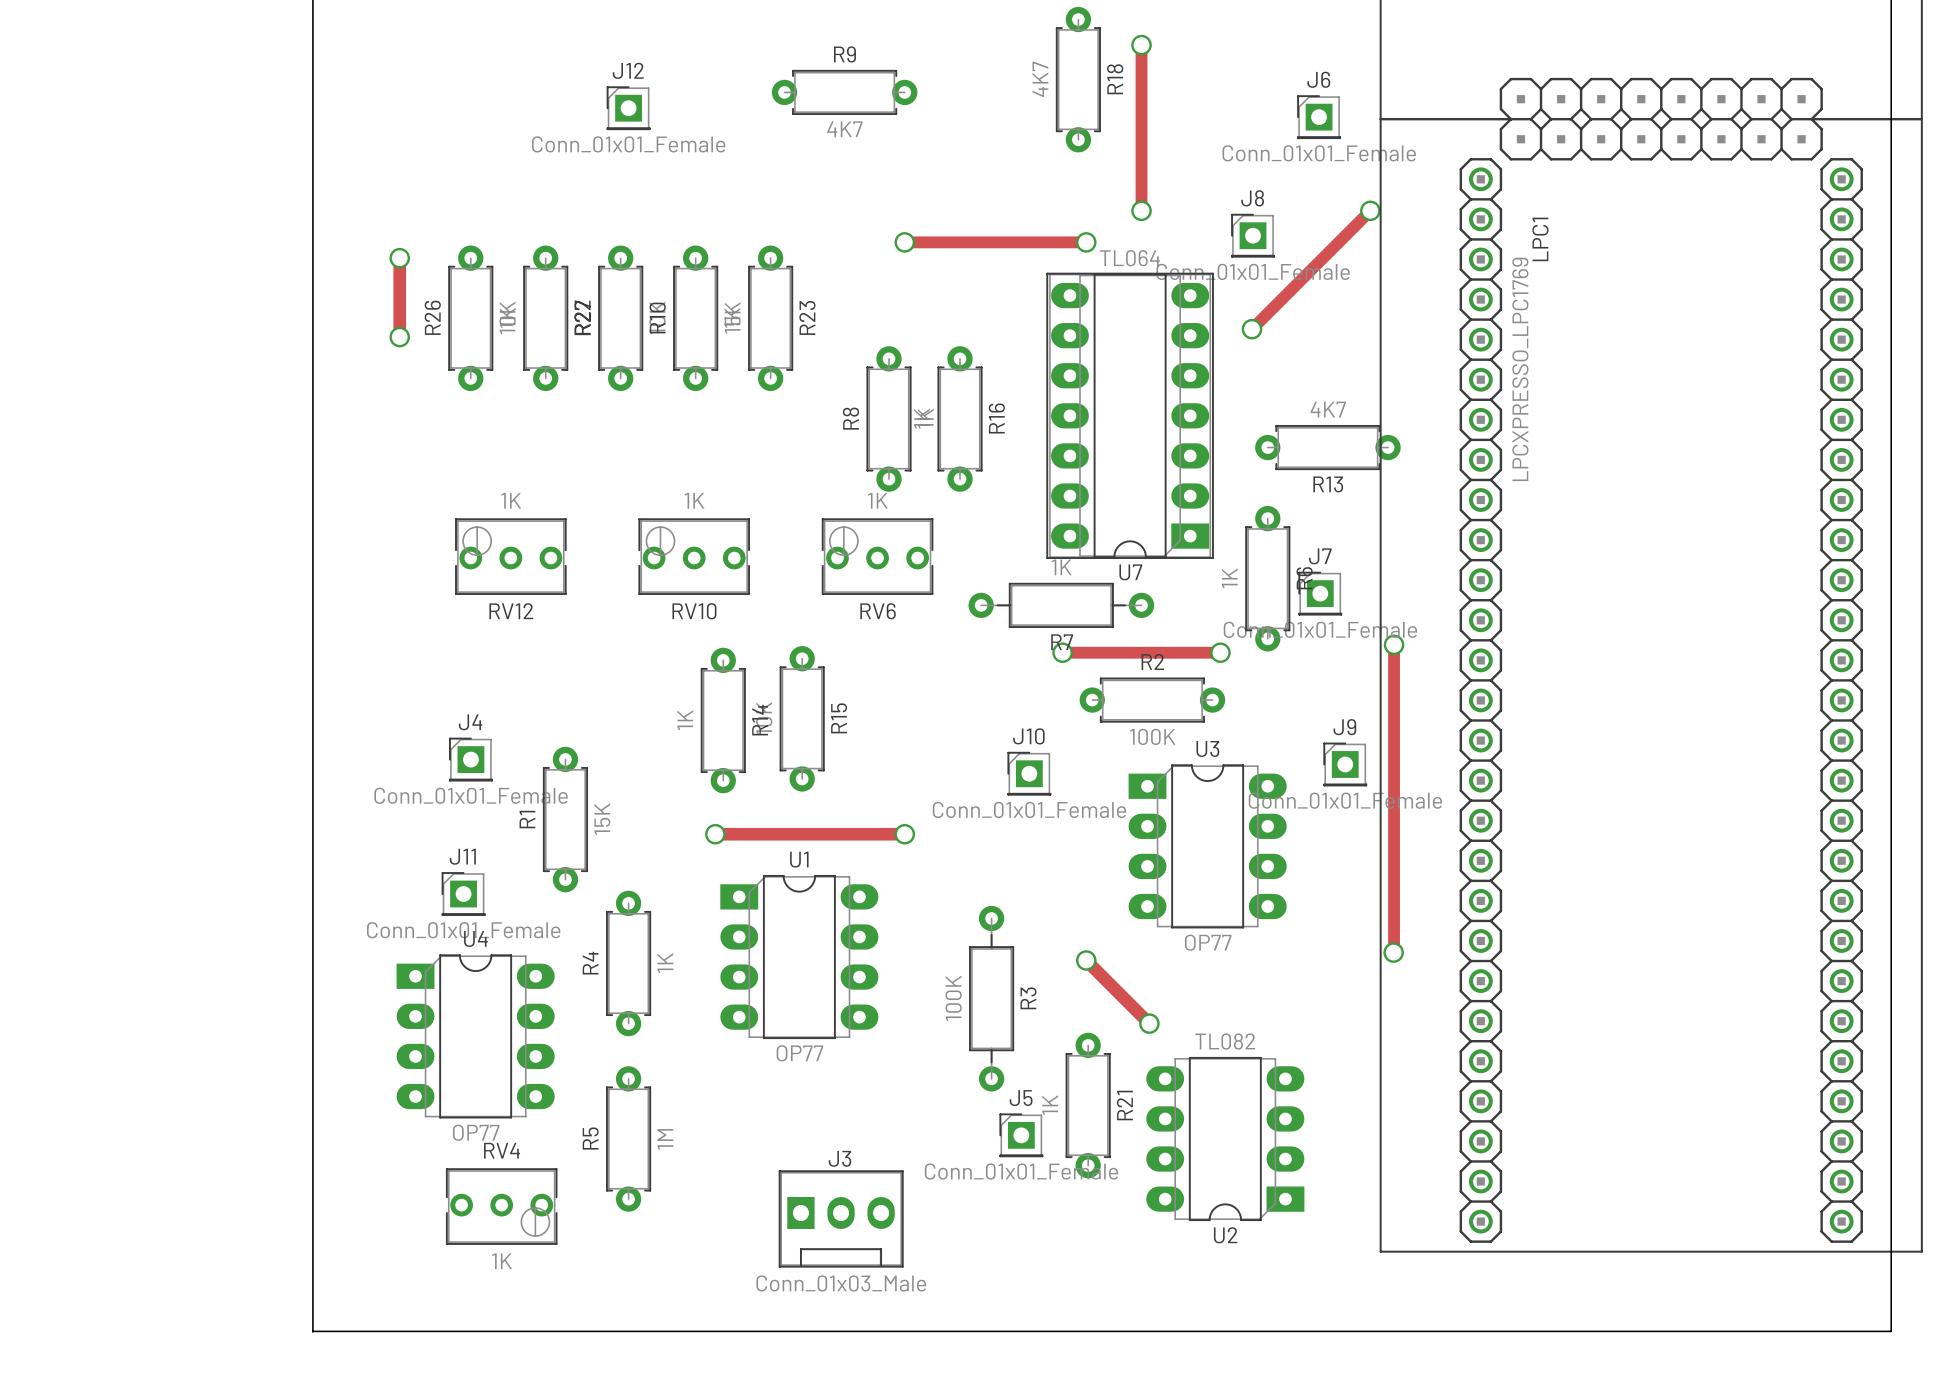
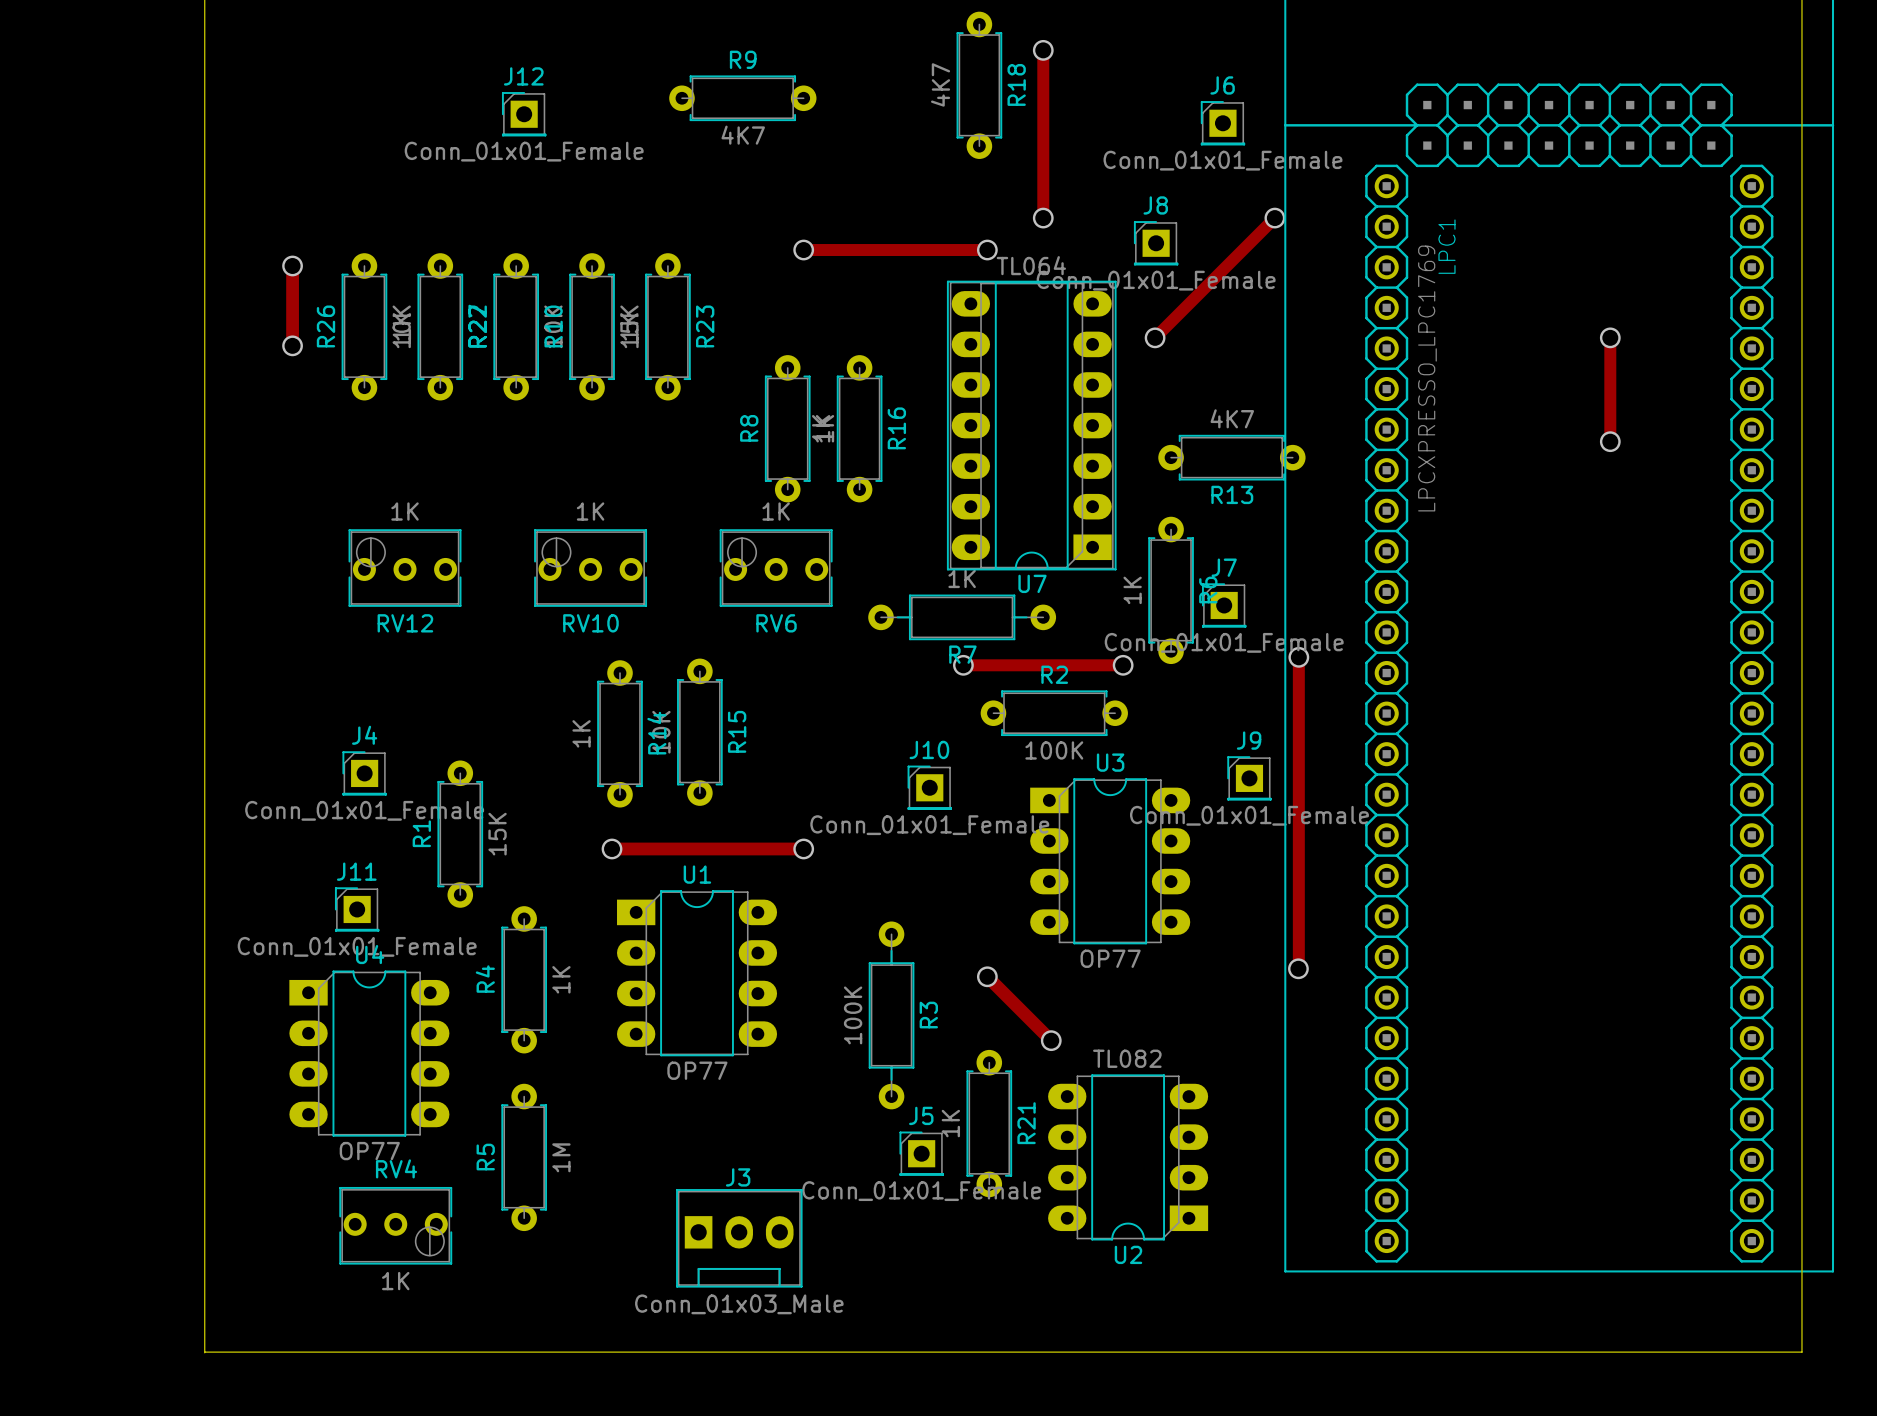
track: none -> (1610, 337) (1610, 441)
via: none -> (1610, 337)
via: none -> (1610, 441)

